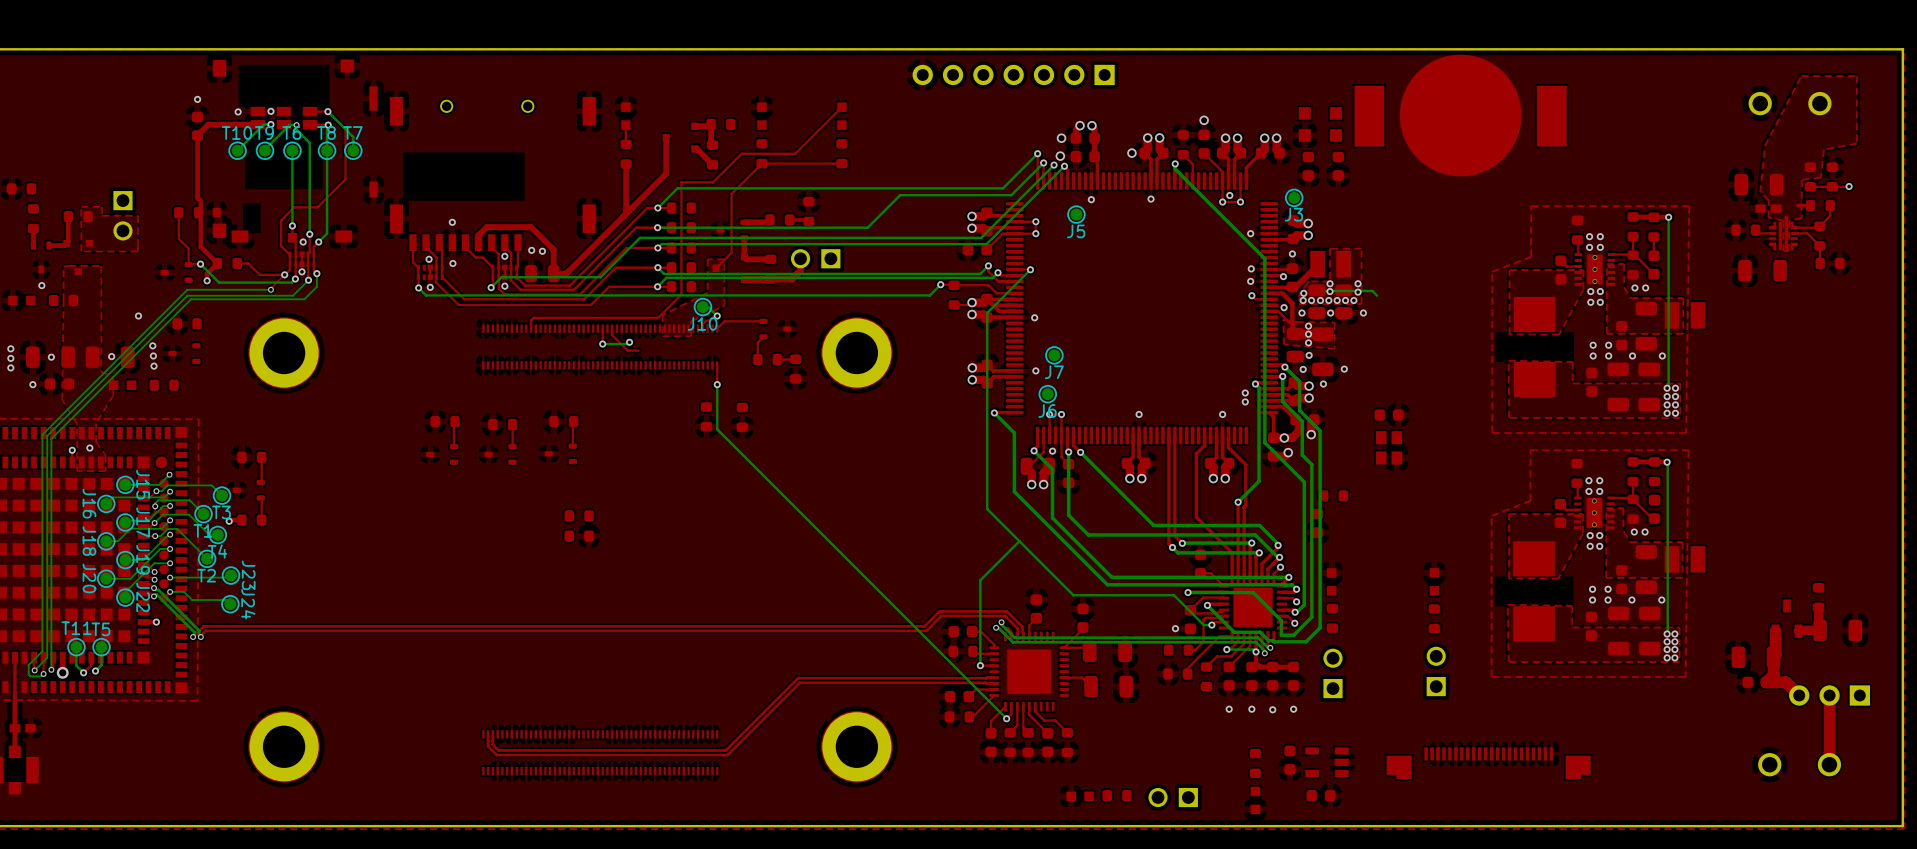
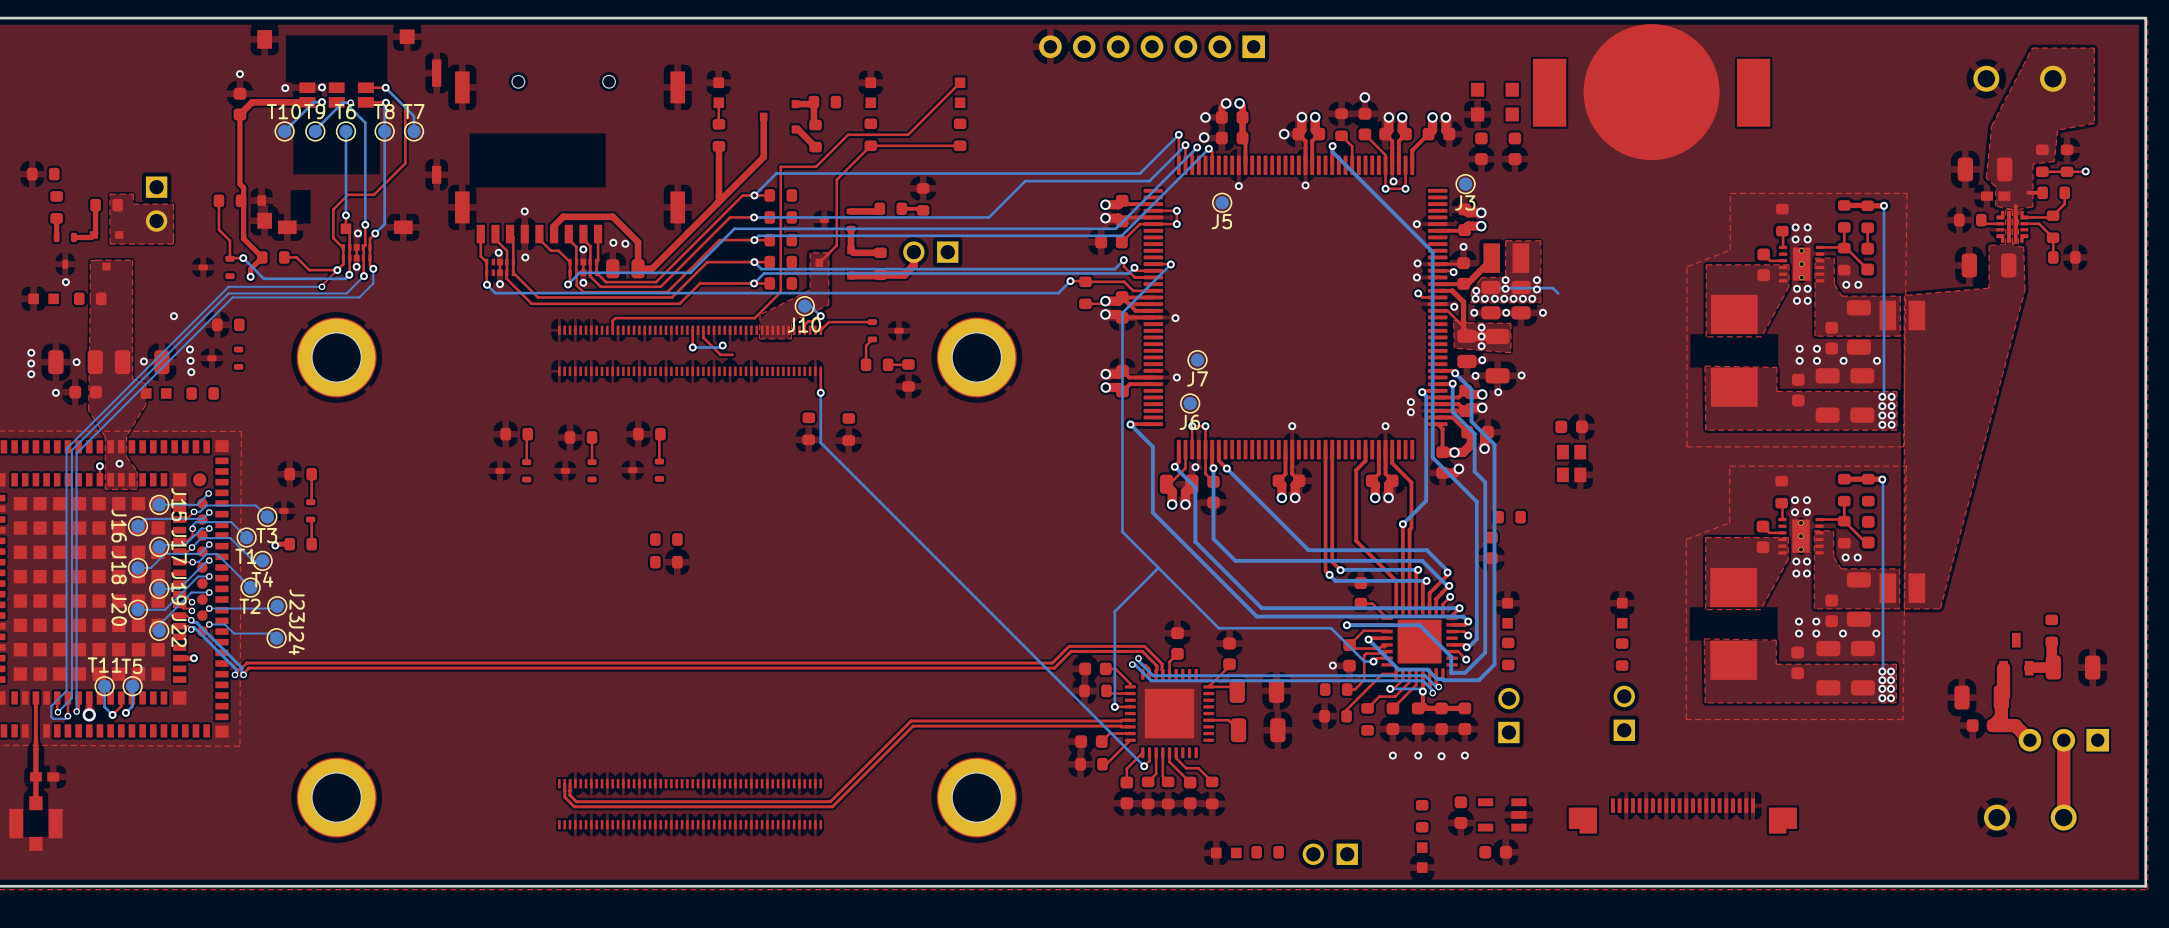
top zone outline: none -> (2012, 209) (2005, 209) (2005, 244) (1989, 245) (1989, 288) (1904, 295) (1904, 608) (1940, 608) (2025, 290) (2023, 247) (2012, 243)

